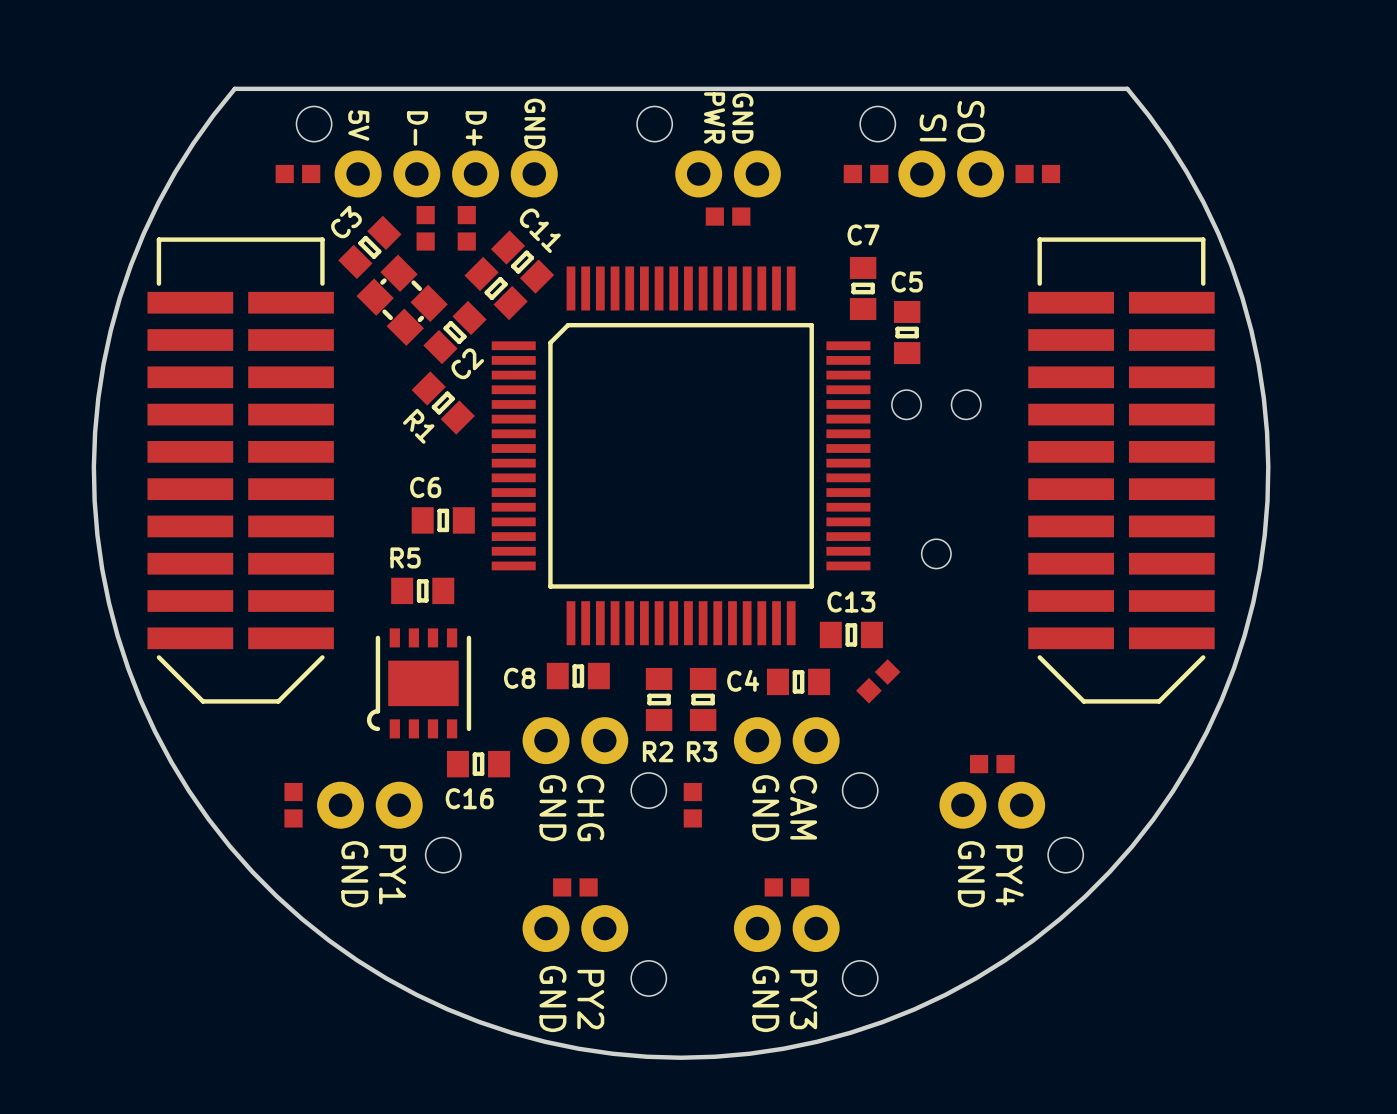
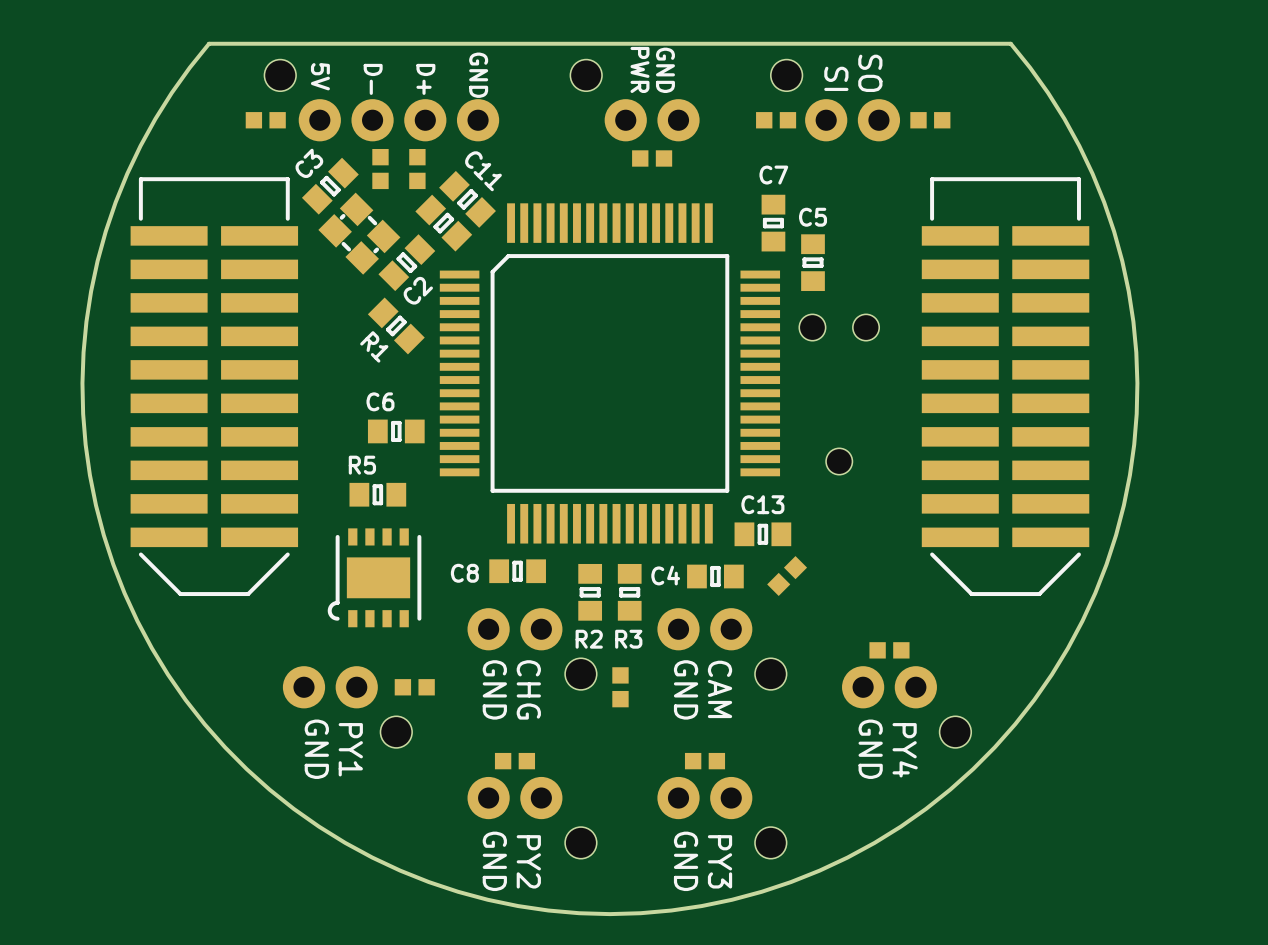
part: (478, 764) -> none
text: C16 (469, 798) -> none
part rotation: 0° (293, 805) -> 90° clockwise (414, 687)
part position: (293, 805) -> (414, 687)

